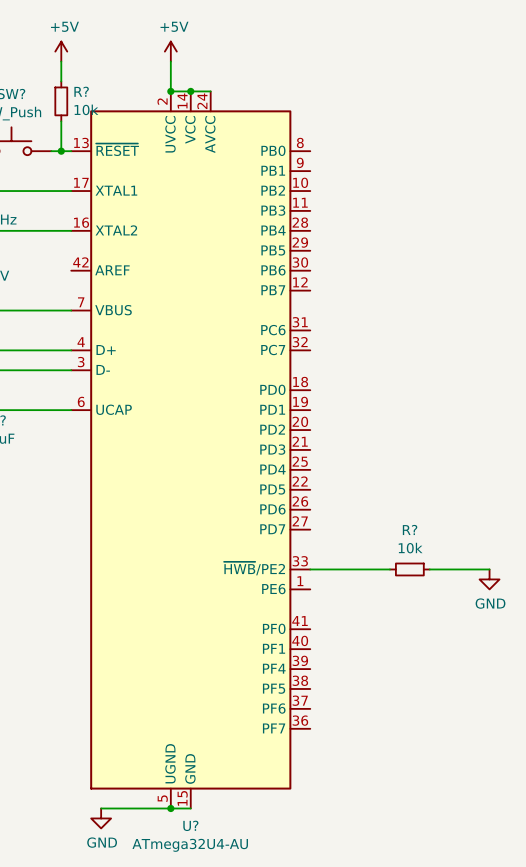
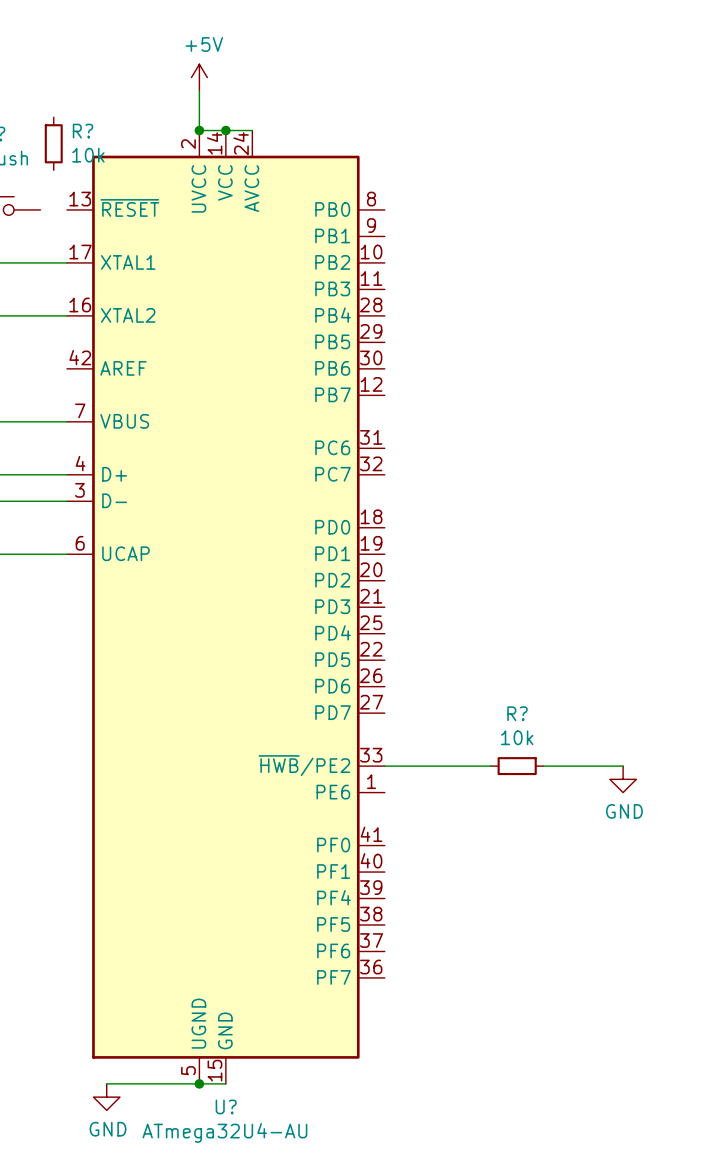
power symbol: +5V (61, 51) -> none
wire: (61, 61) (61, 81) -> none
wire: (61, 121) (61, 151) -> none
wire: (51, 151) (71, 151) -> none
junction: (61, 151) -> none

